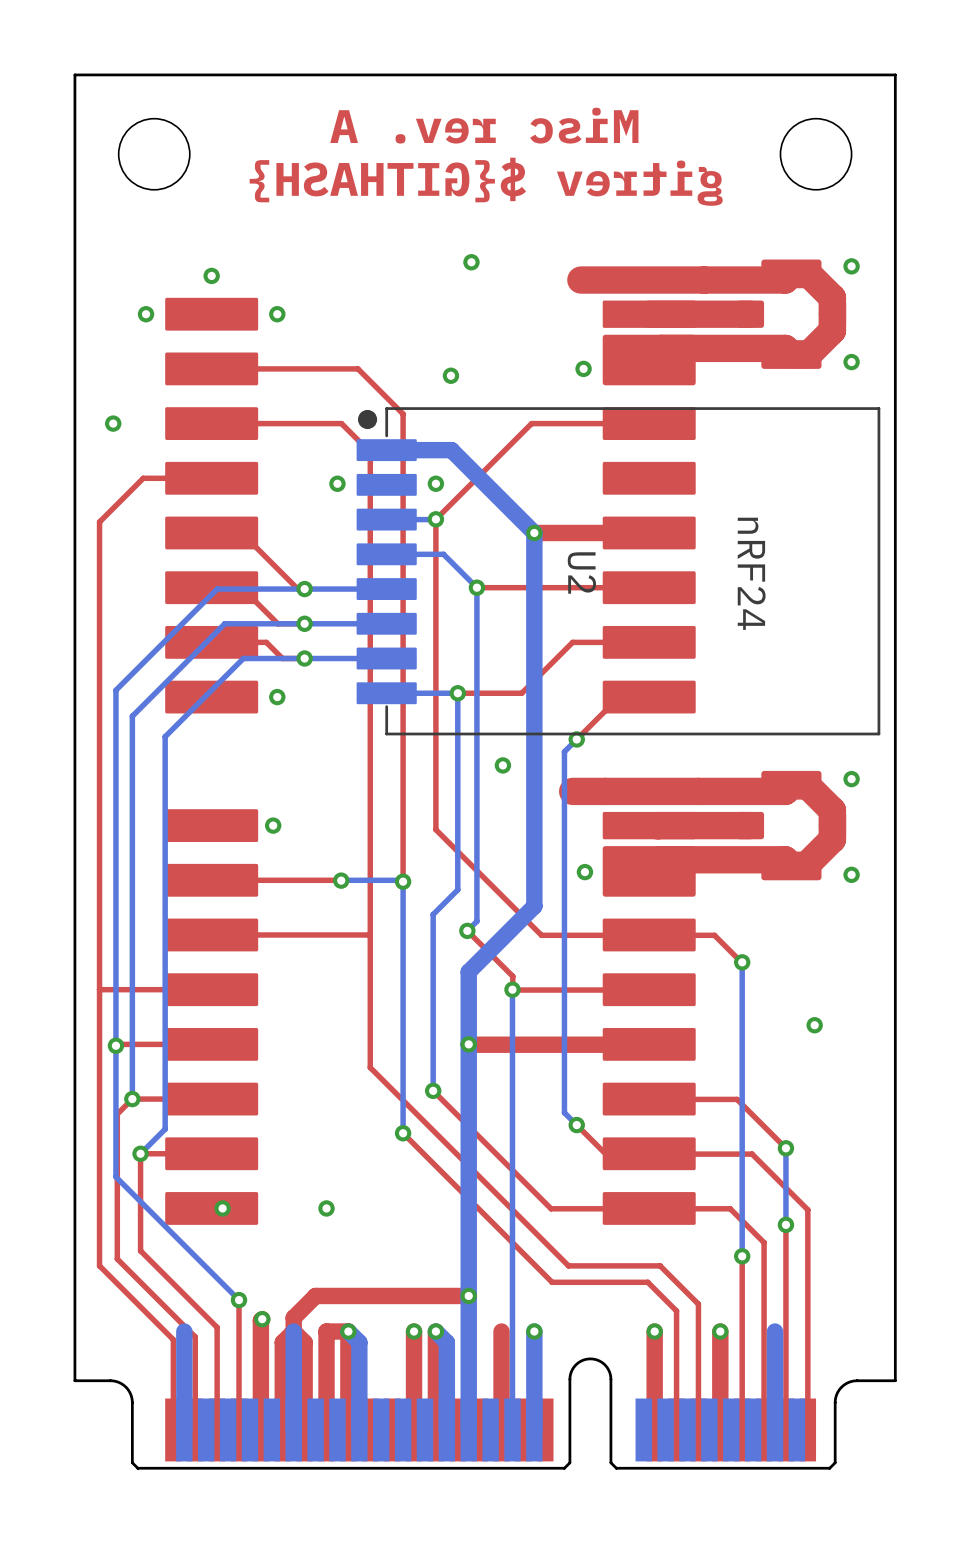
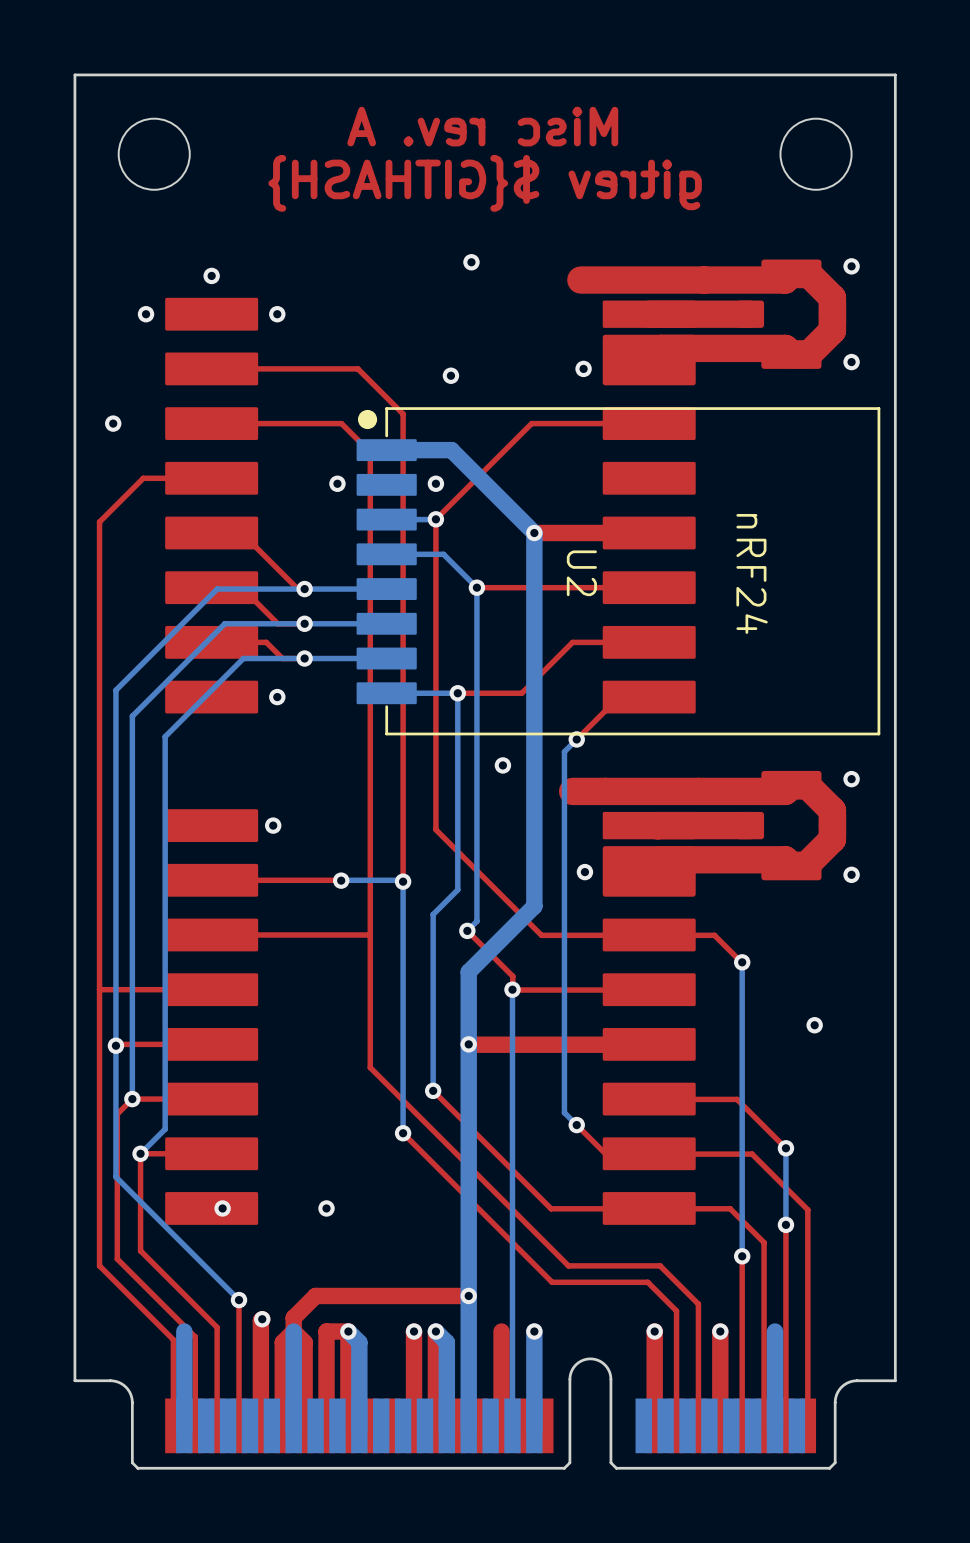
part footprint: [73, 73, 897, 1470] -> [73, 73, 897, 1470]

